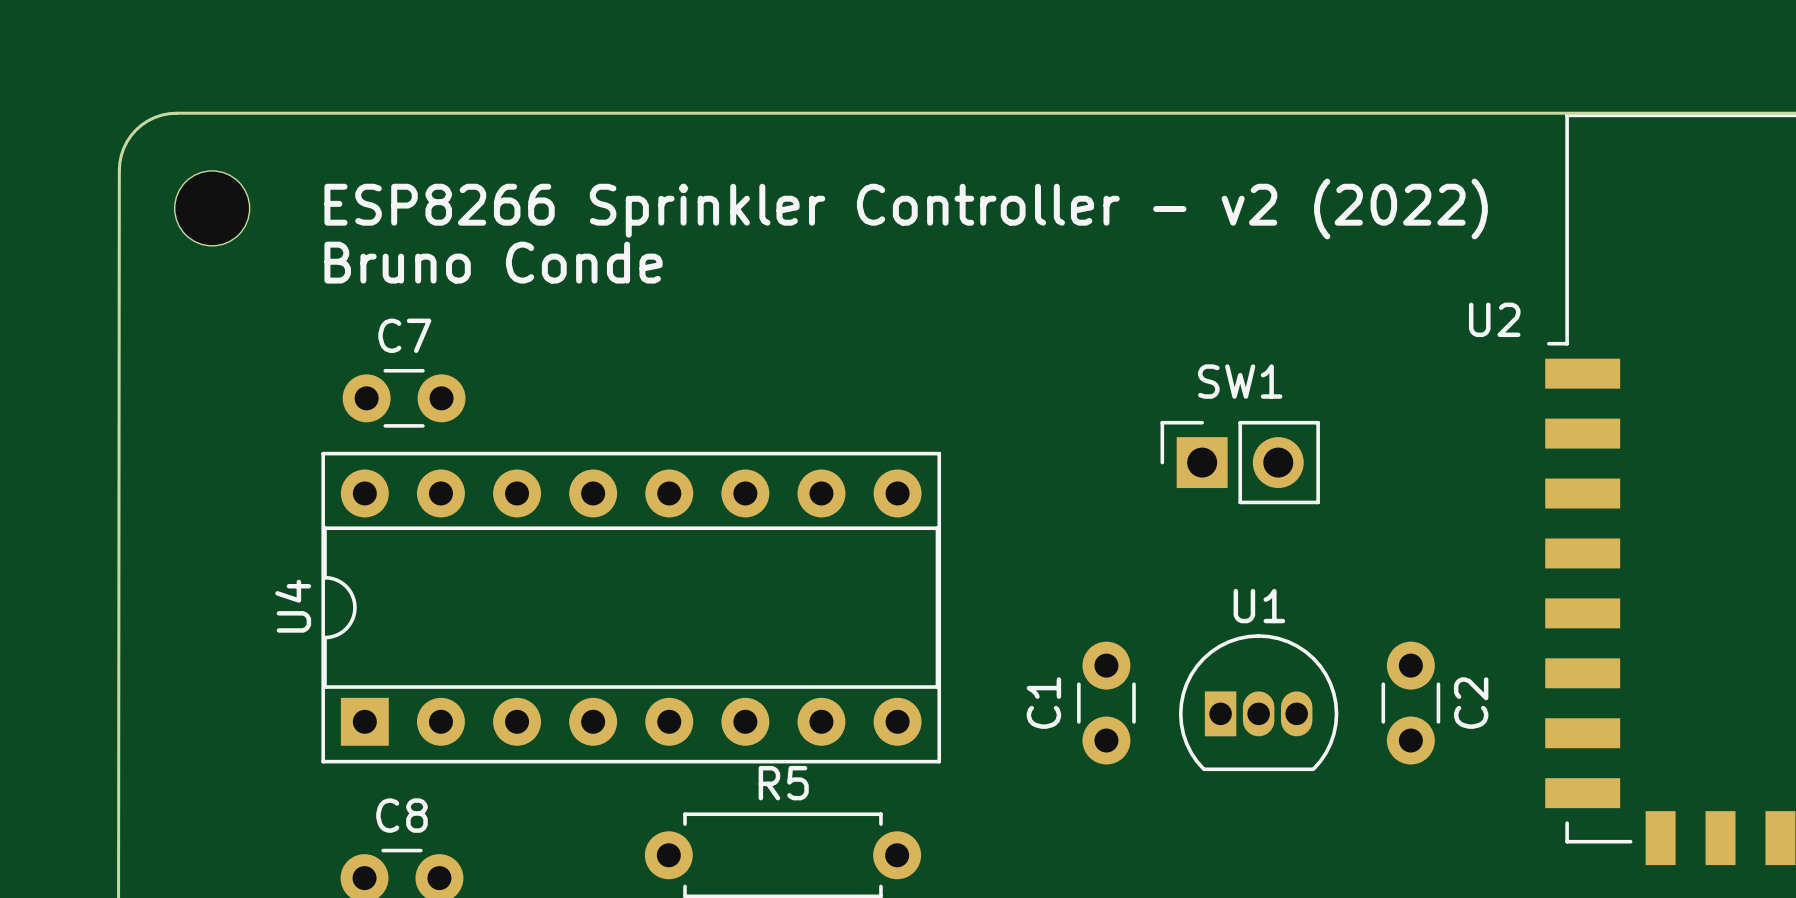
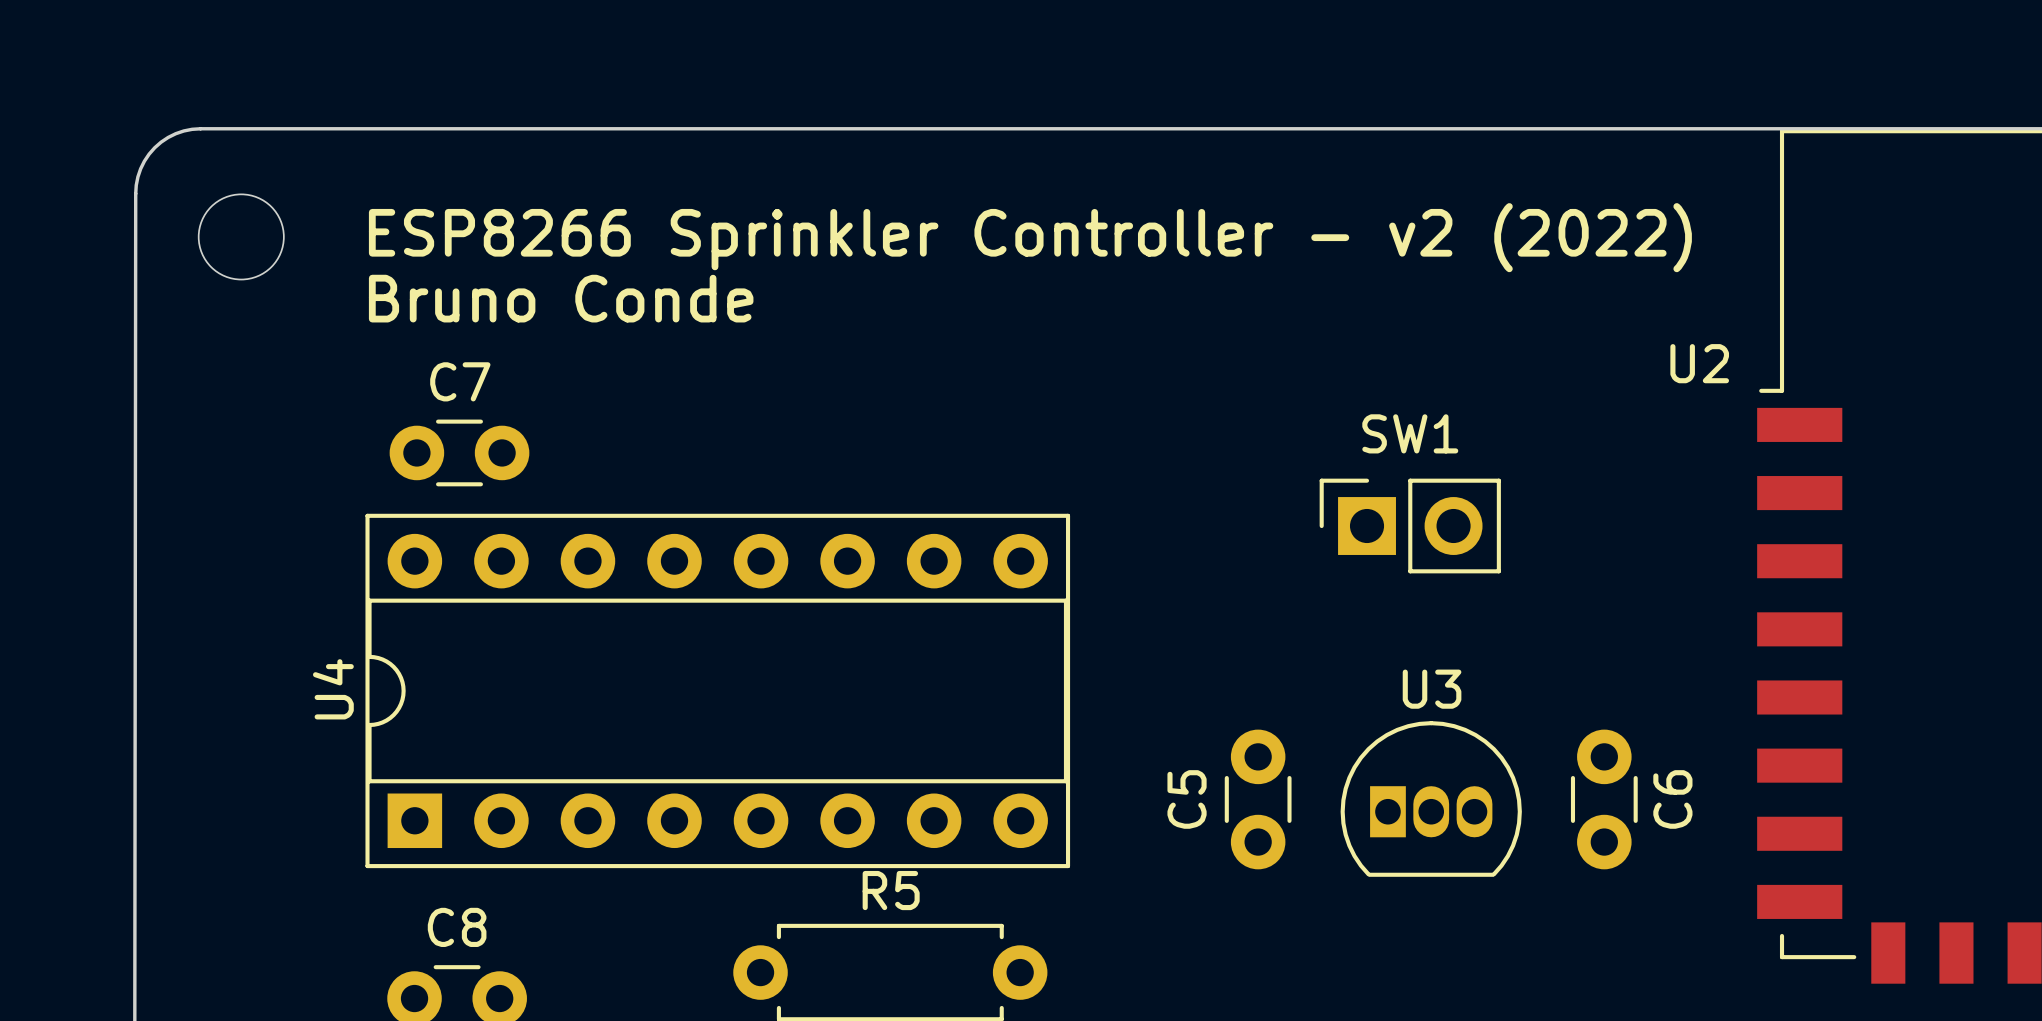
U1 name: U1 (1259, 606) -> U3 (1432, 689)
C1 name: C1 (1043, 703) -> C5 (1187, 799)
C2 name: C2 (1471, 703) -> C6 (1672, 799)

